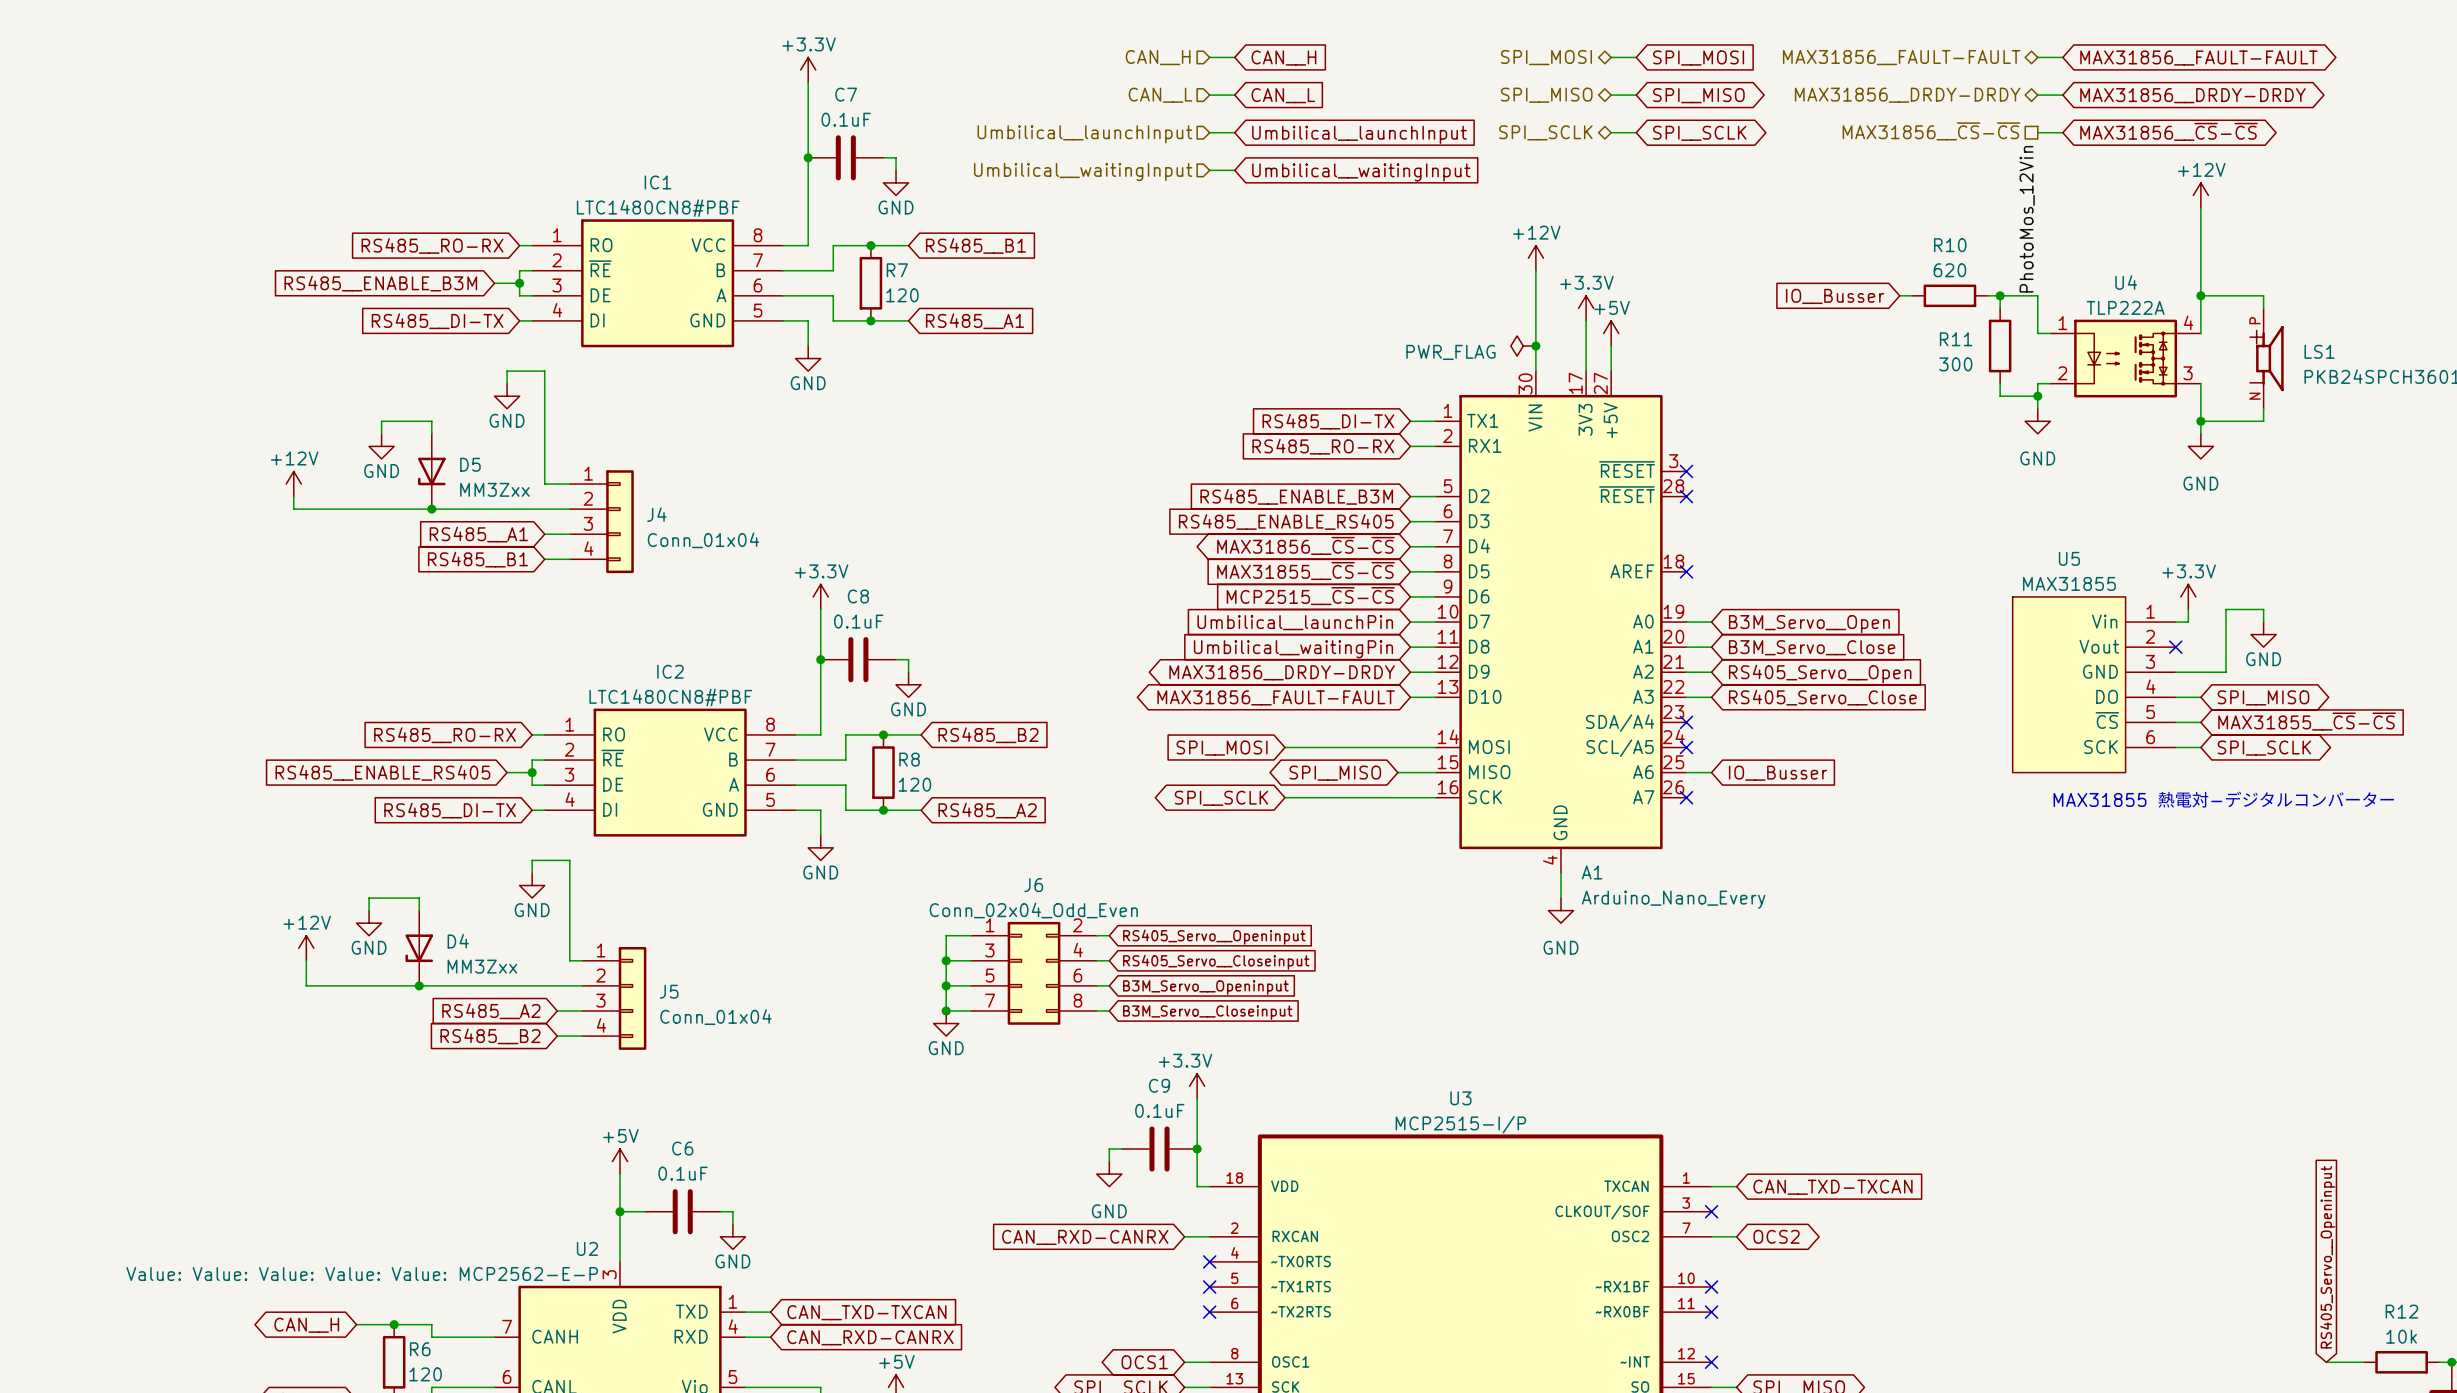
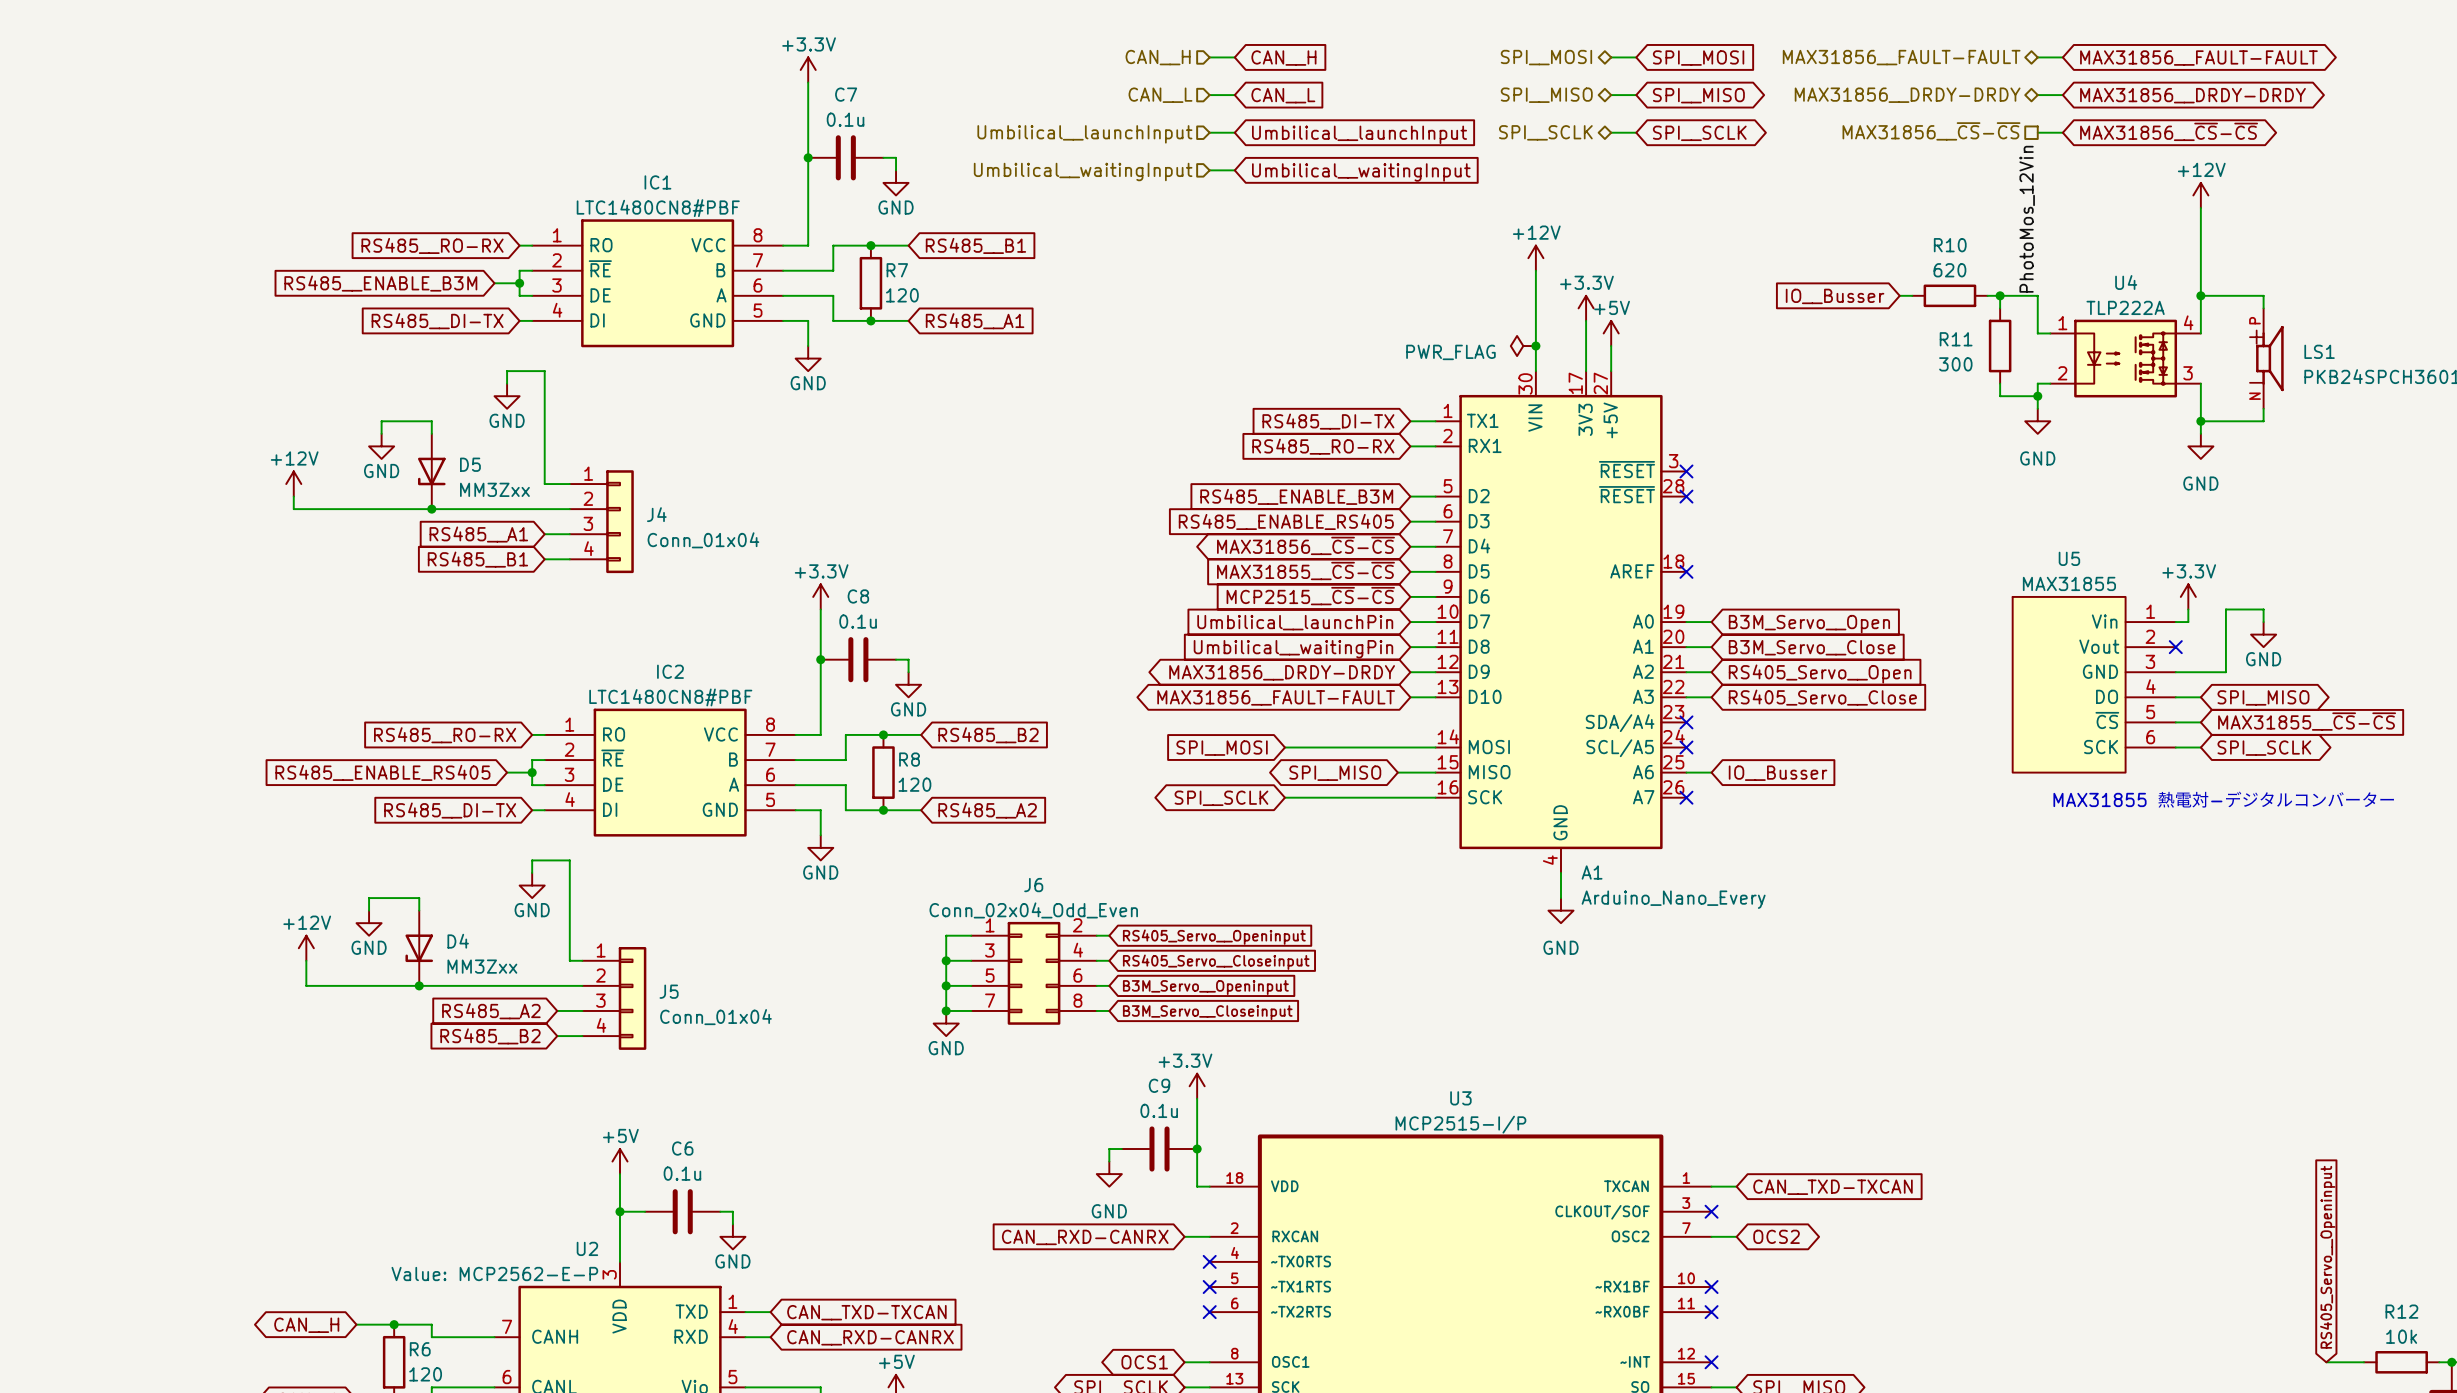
C7 value: 0.1uF (846, 119) -> 0.1u (845, 119)
C8 value: 0.1uF (858, 621) -> 0.1u (858, 621)
C9 value: 0.1uF (1159, 1110) -> 0.1u (1159, 1110)
C6 value: 0.1uF (683, 1173) -> 0.1u (682, 1173)
U2 value: Value: Value: Value: Value: Value: MCP2562-E-P (362, 1274) -> Value: MCP2562-E-P (494, 1274)

